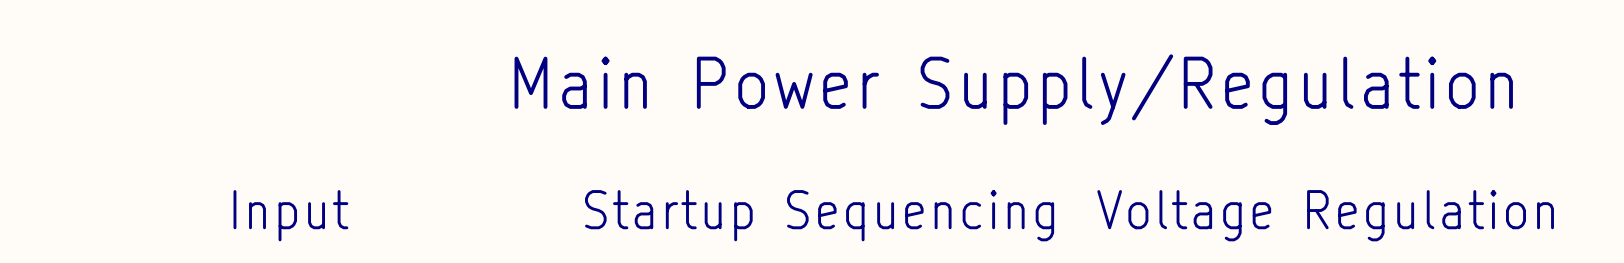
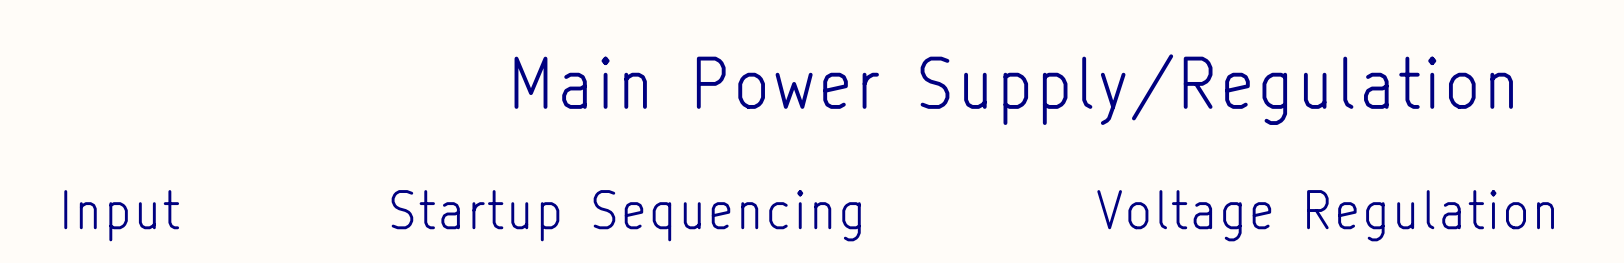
text position: Input (290, 215) -> Input (121, 215)
text position: Startup Sequencing (819, 215) -> Startup Sequencing (626, 215)

